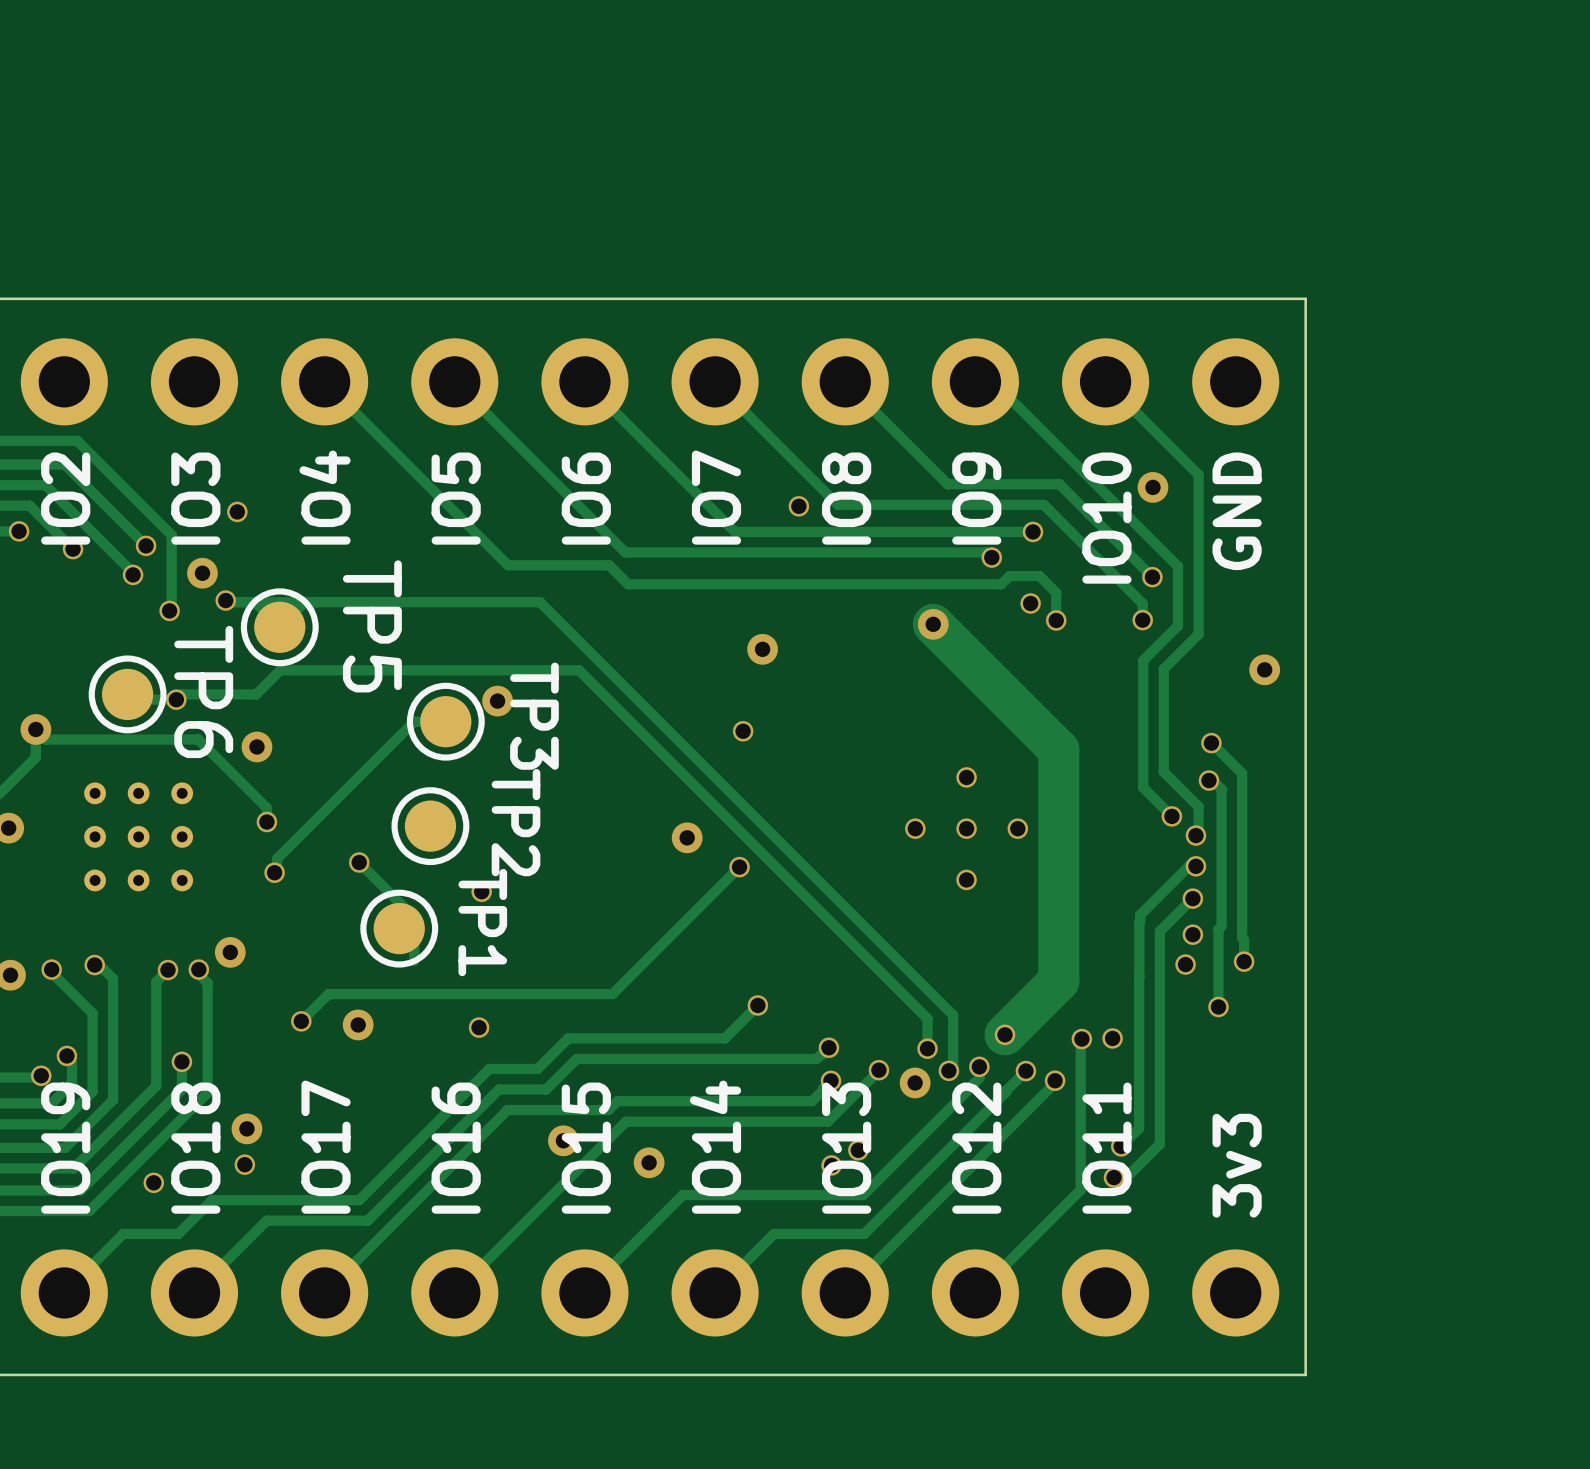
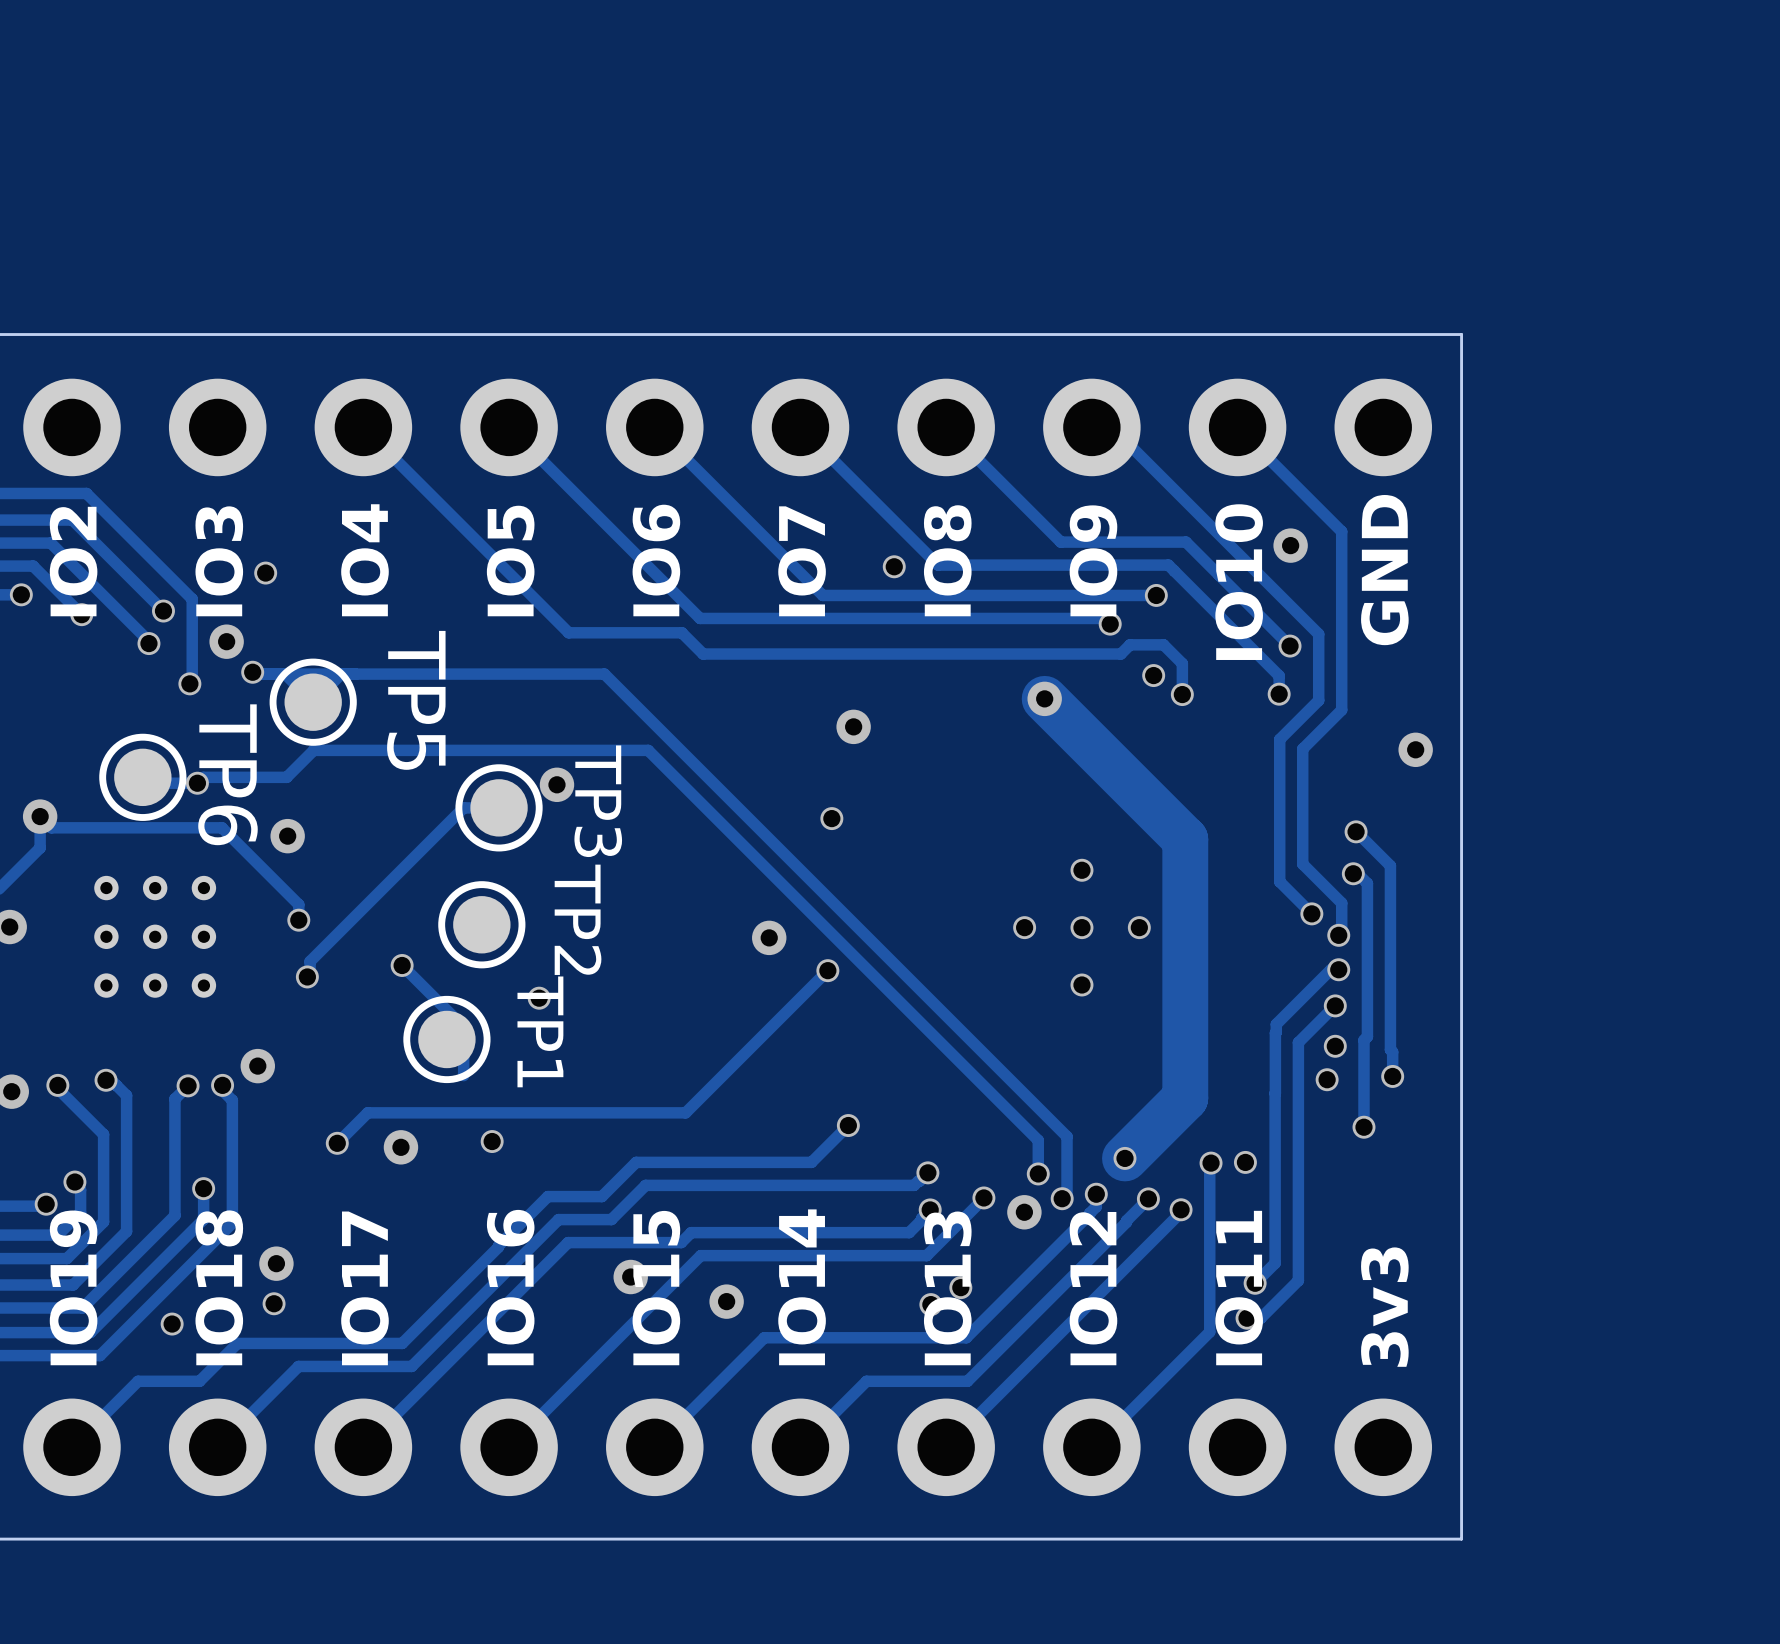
via position: (479, 1027) -> (492, 1141)

